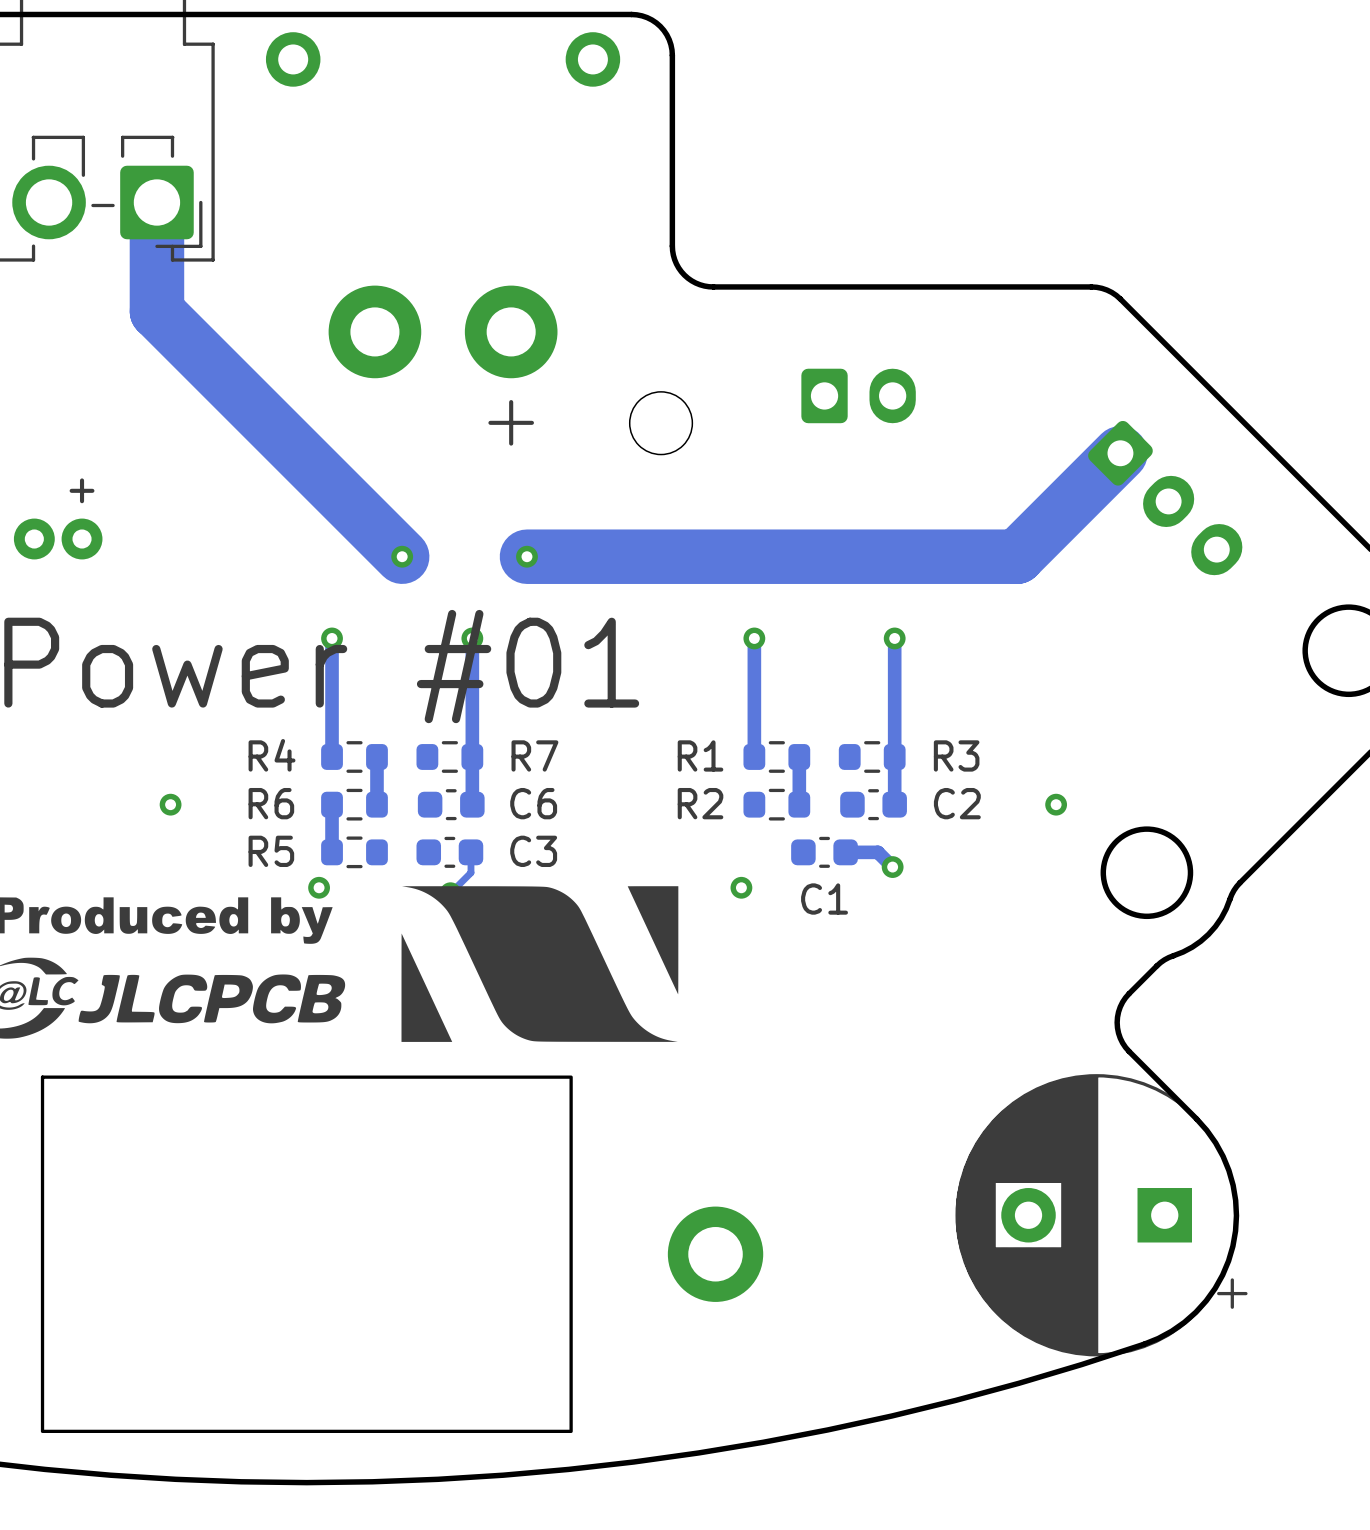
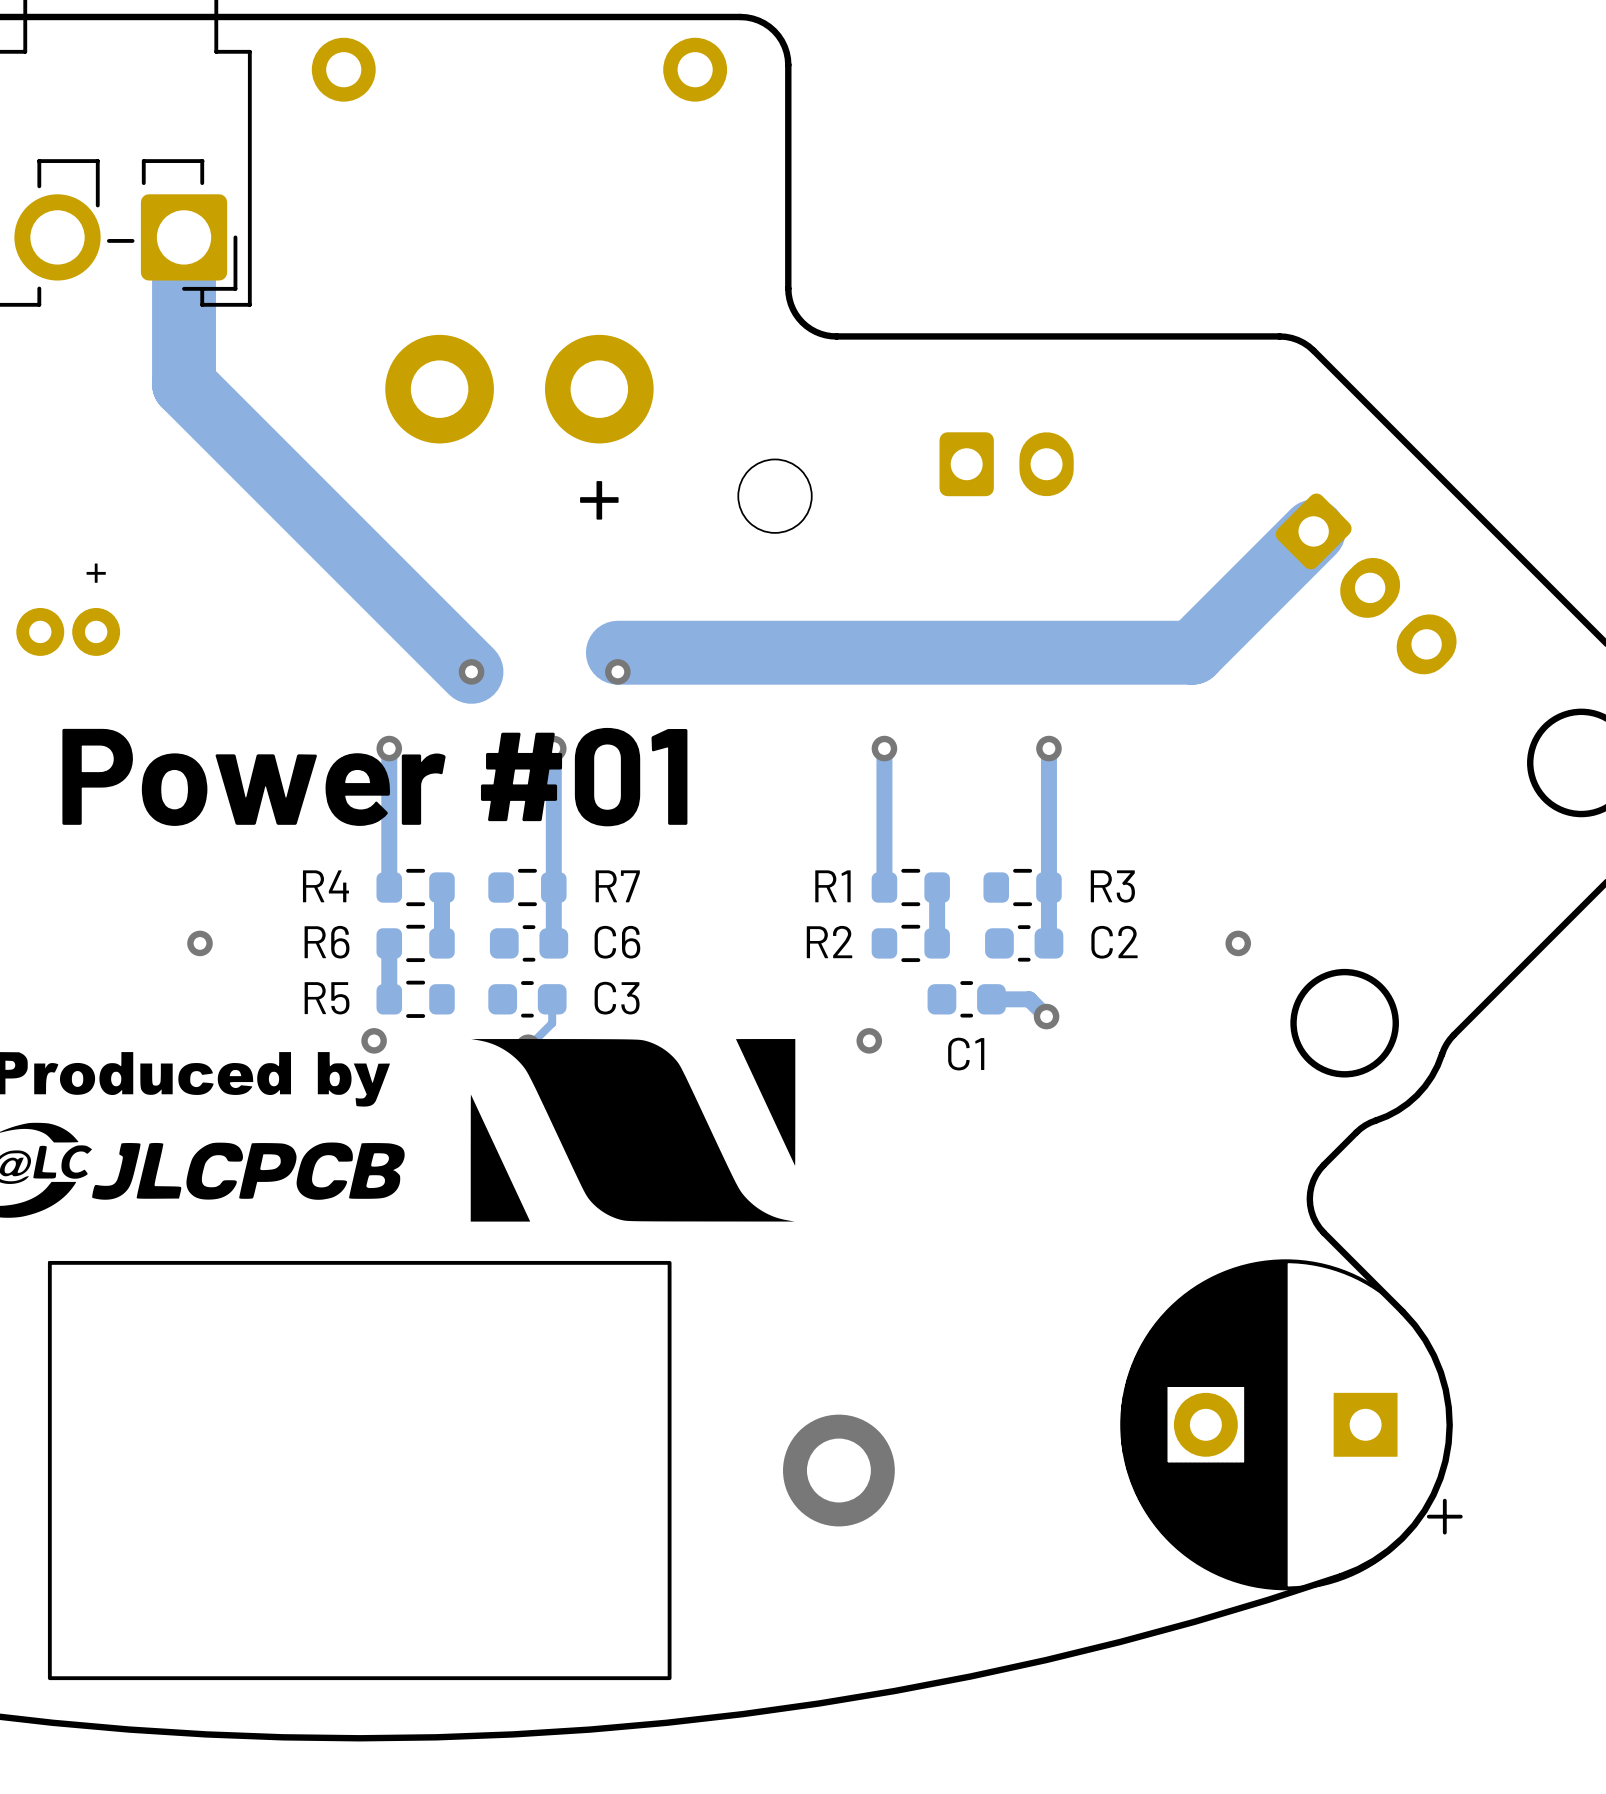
track: (156, 311) (402, 556) -> (184, 365) (184, 384) (471, 671)
via position: (402, 556) -> (471, 671)
via position: (526, 556) -> (617, 671)

